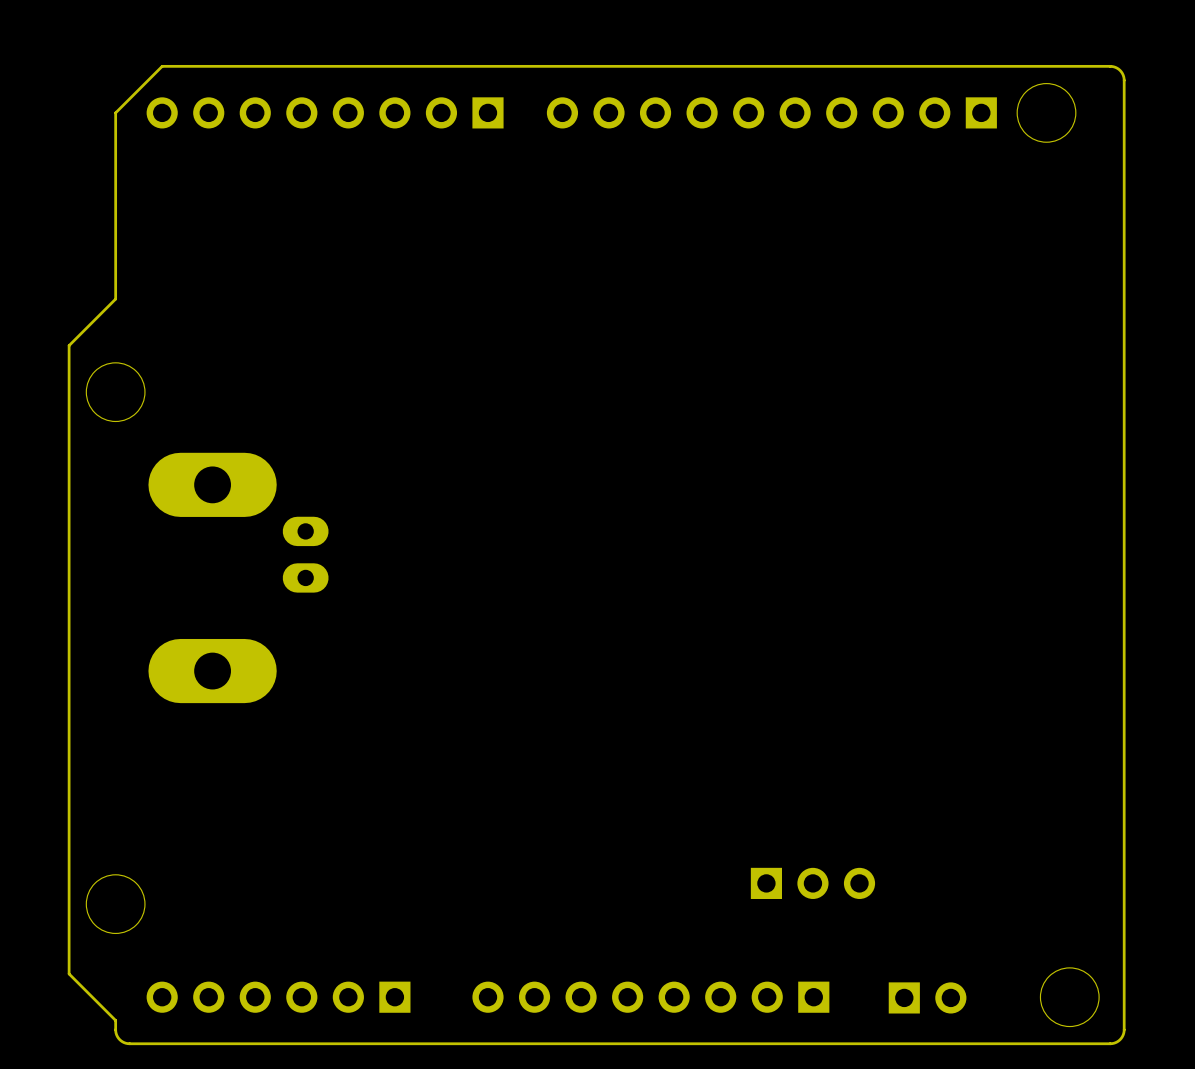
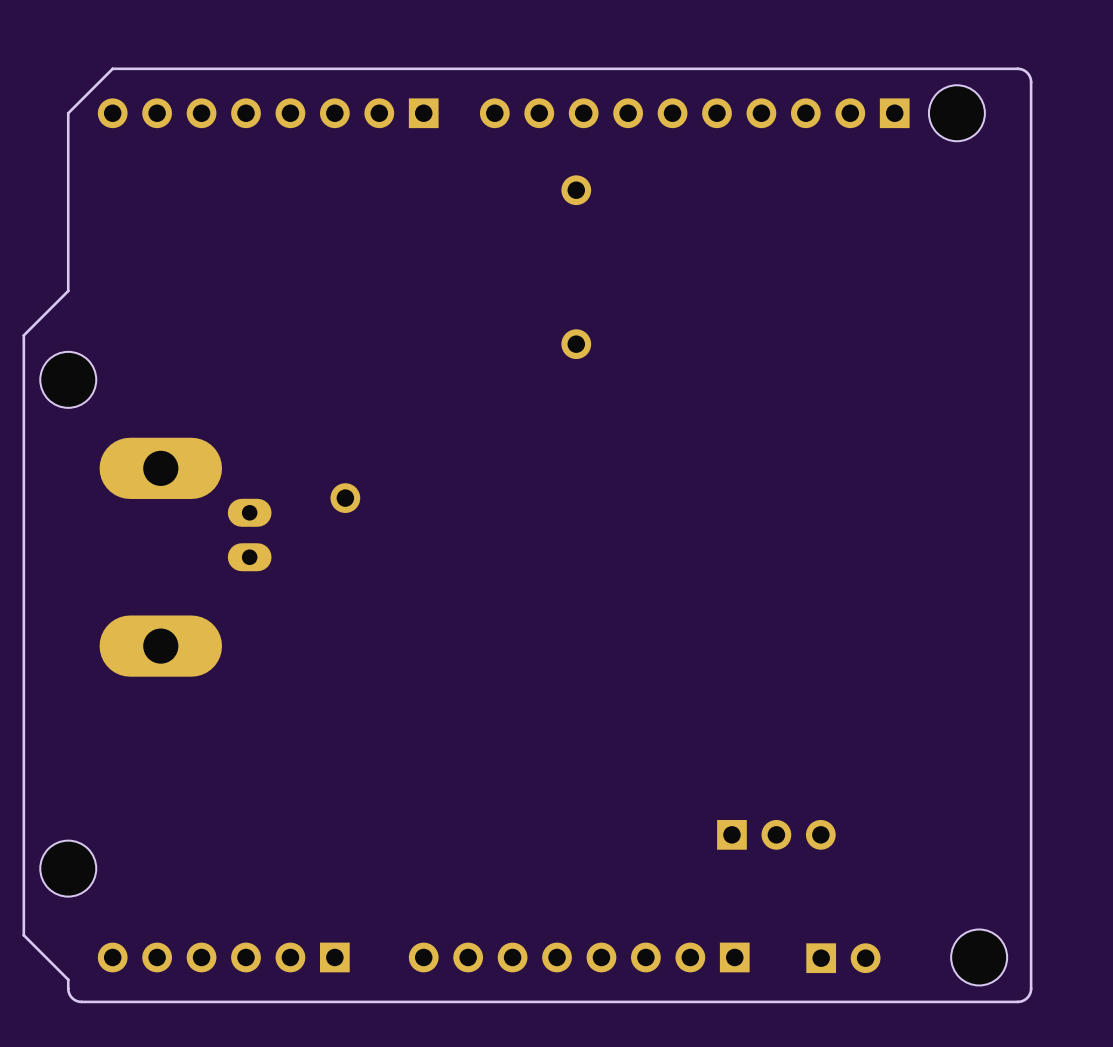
part: none -> (576, 190)
part: none -> (576, 344)
part: none -> (345, 498)
part position: (812, 883) -> (776, 834)

